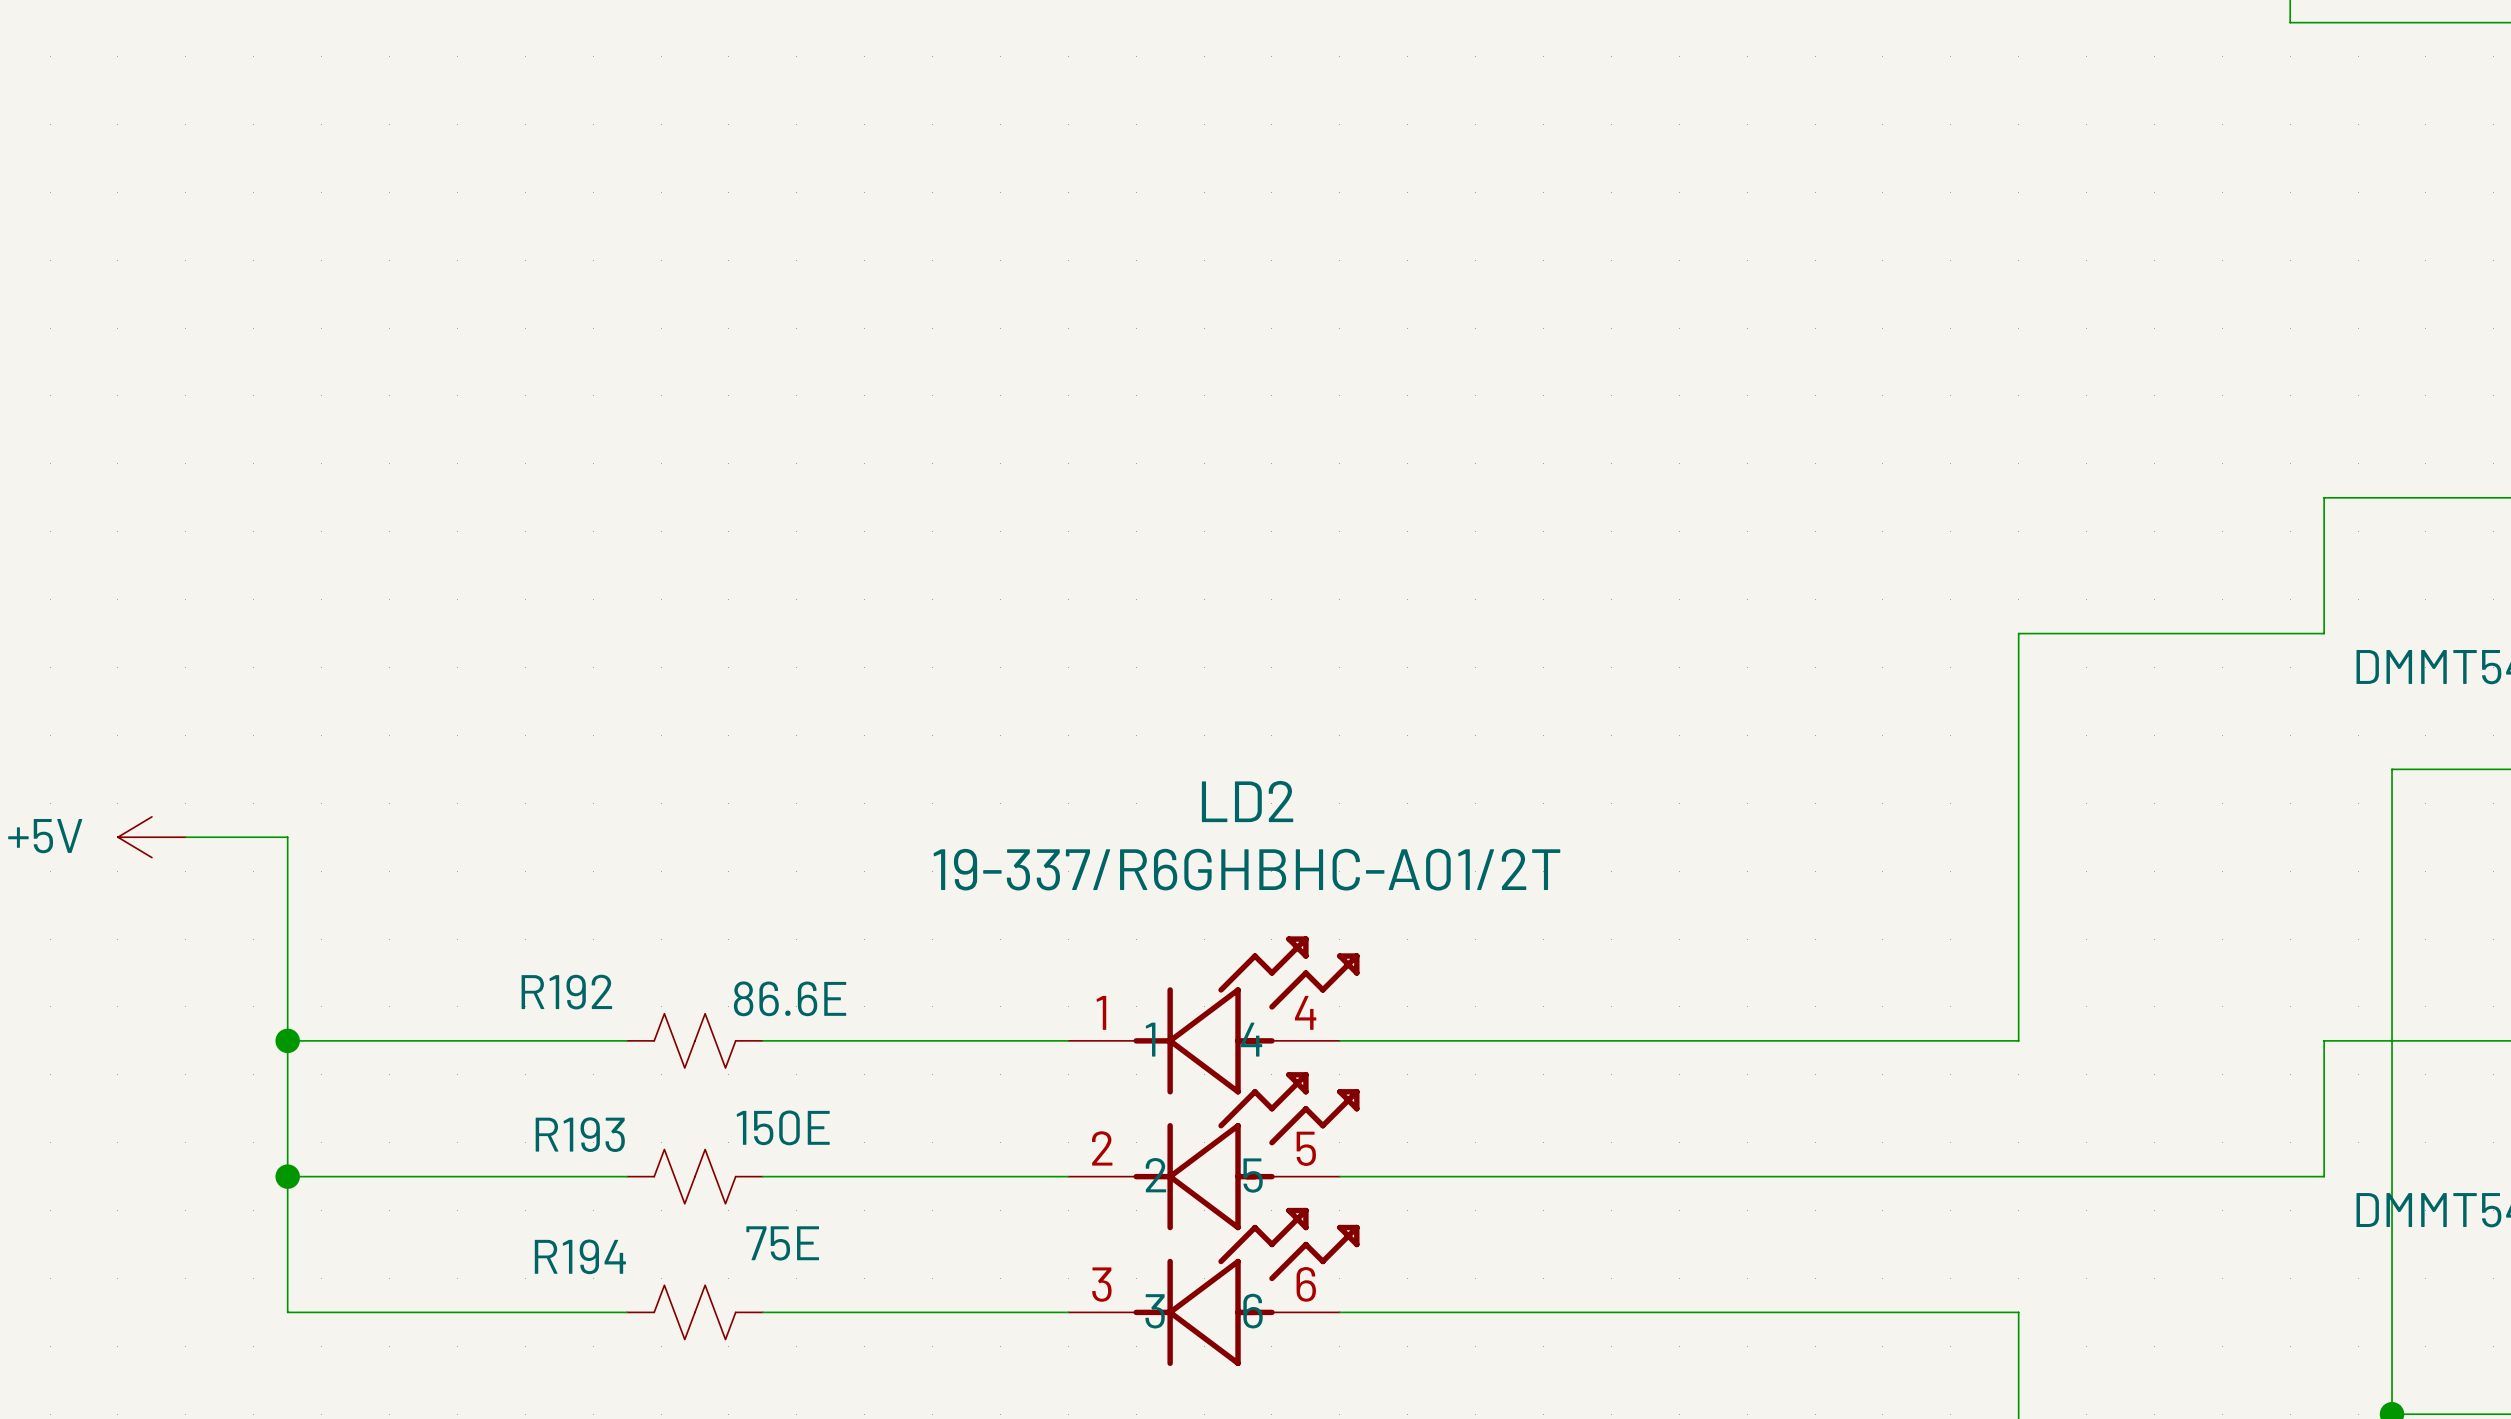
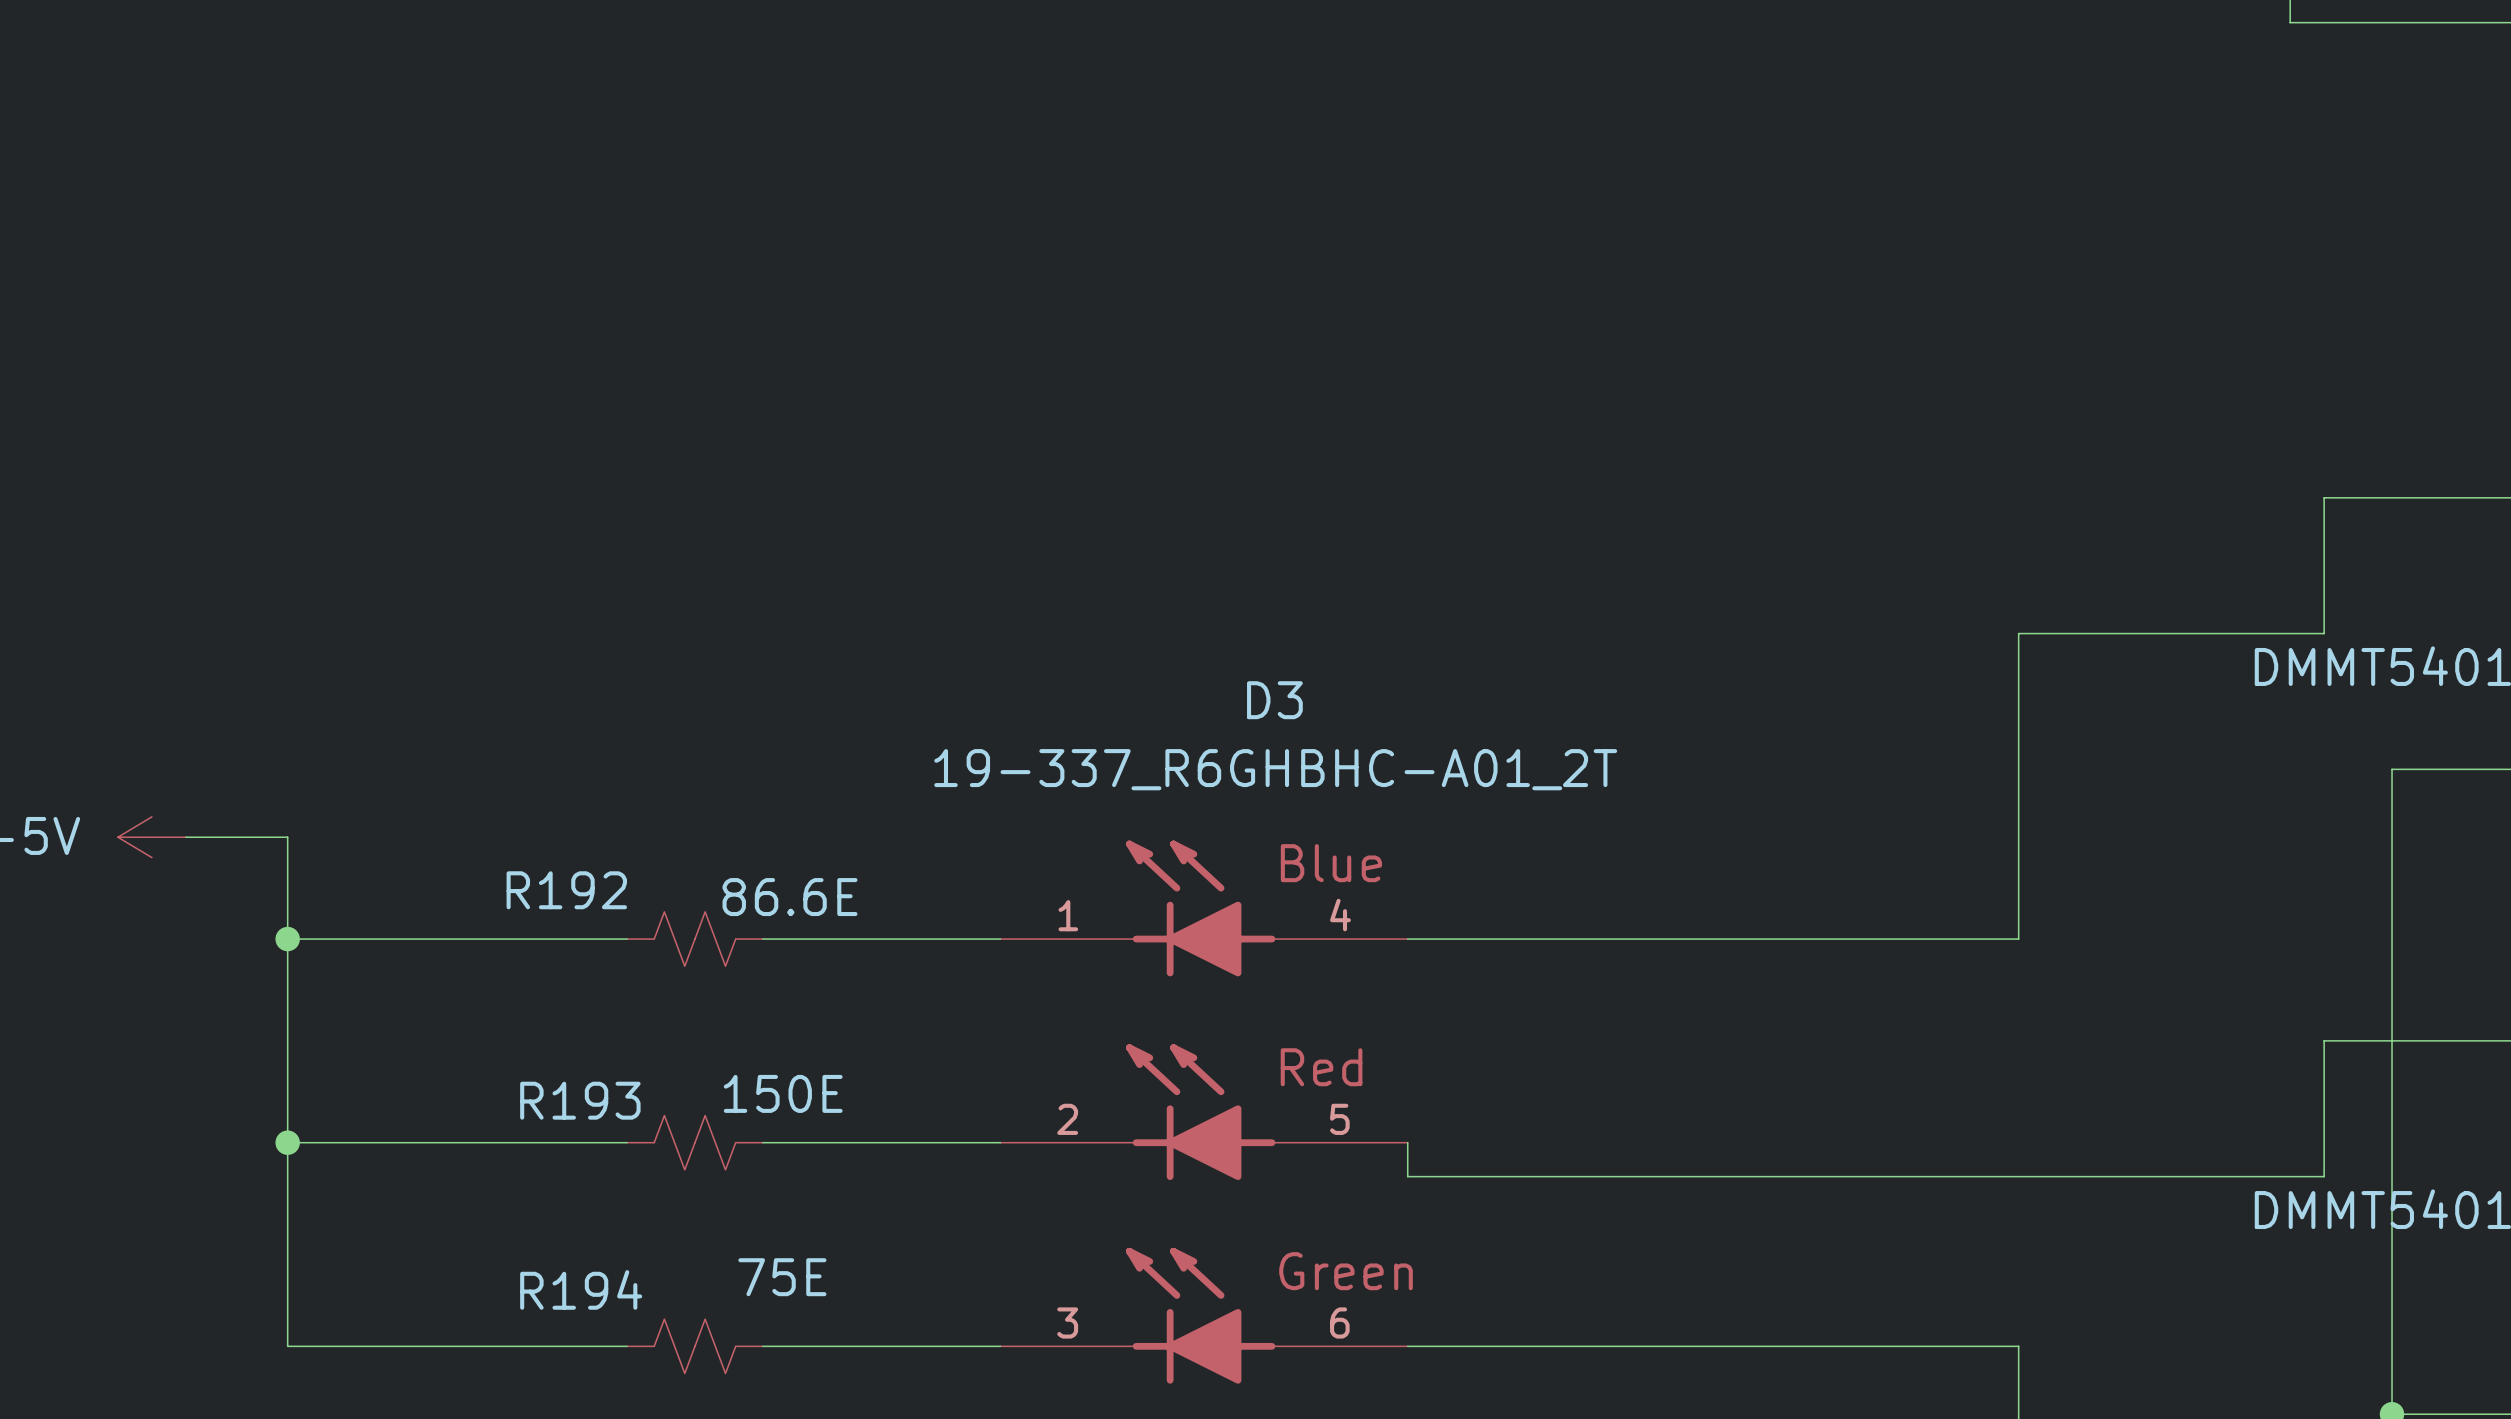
junction: none -> (287, 939)
wire: none -> (762, 939) (1000, 939)
wire: (2018, 939) (2018, 1040) (1339, 1040) -> (2018, 939) (1407, 939)
wire: (287, 1040) (627, 1040) -> (287, 939) (627, 939)
junction: (287, 1040) -> none
R192 position: (694, 1040) -> (694, 939)
wire: (762, 1040) (1068, 1040) -> none
D3: none -> 19-337_R6GHBHC-A01_2T (1204, 1112)
wire: none -> (762, 1142) (1000, 1142)
LD2: 19-337/R6GHBHC-A01/2T (1213, 1151) -> none
wire: (287, 1176) (627, 1176) -> (287, 1142) (627, 1142)
junction position: (287, 1176) -> (287, 1142)
R193 position: (694, 1176) -> (694, 1142)
wire: (762, 1176) (1068, 1176) -> none
wire: (1339, 1176) (1407, 1176) -> (1407, 1142) (1407, 1176)
wire: (287, 1312) (627, 1312) -> (287, 1312) (287, 1346) (627, 1346)
R194 position: (694, 1312) -> (694, 1346)
wire: (762, 1312) (1068, 1312) -> none
wire: (1339, 1312) (2018, 1312) (2018, 1346) -> (1407, 1346) (2018, 1346)
wire: none -> (762, 1346) (1000, 1346)

